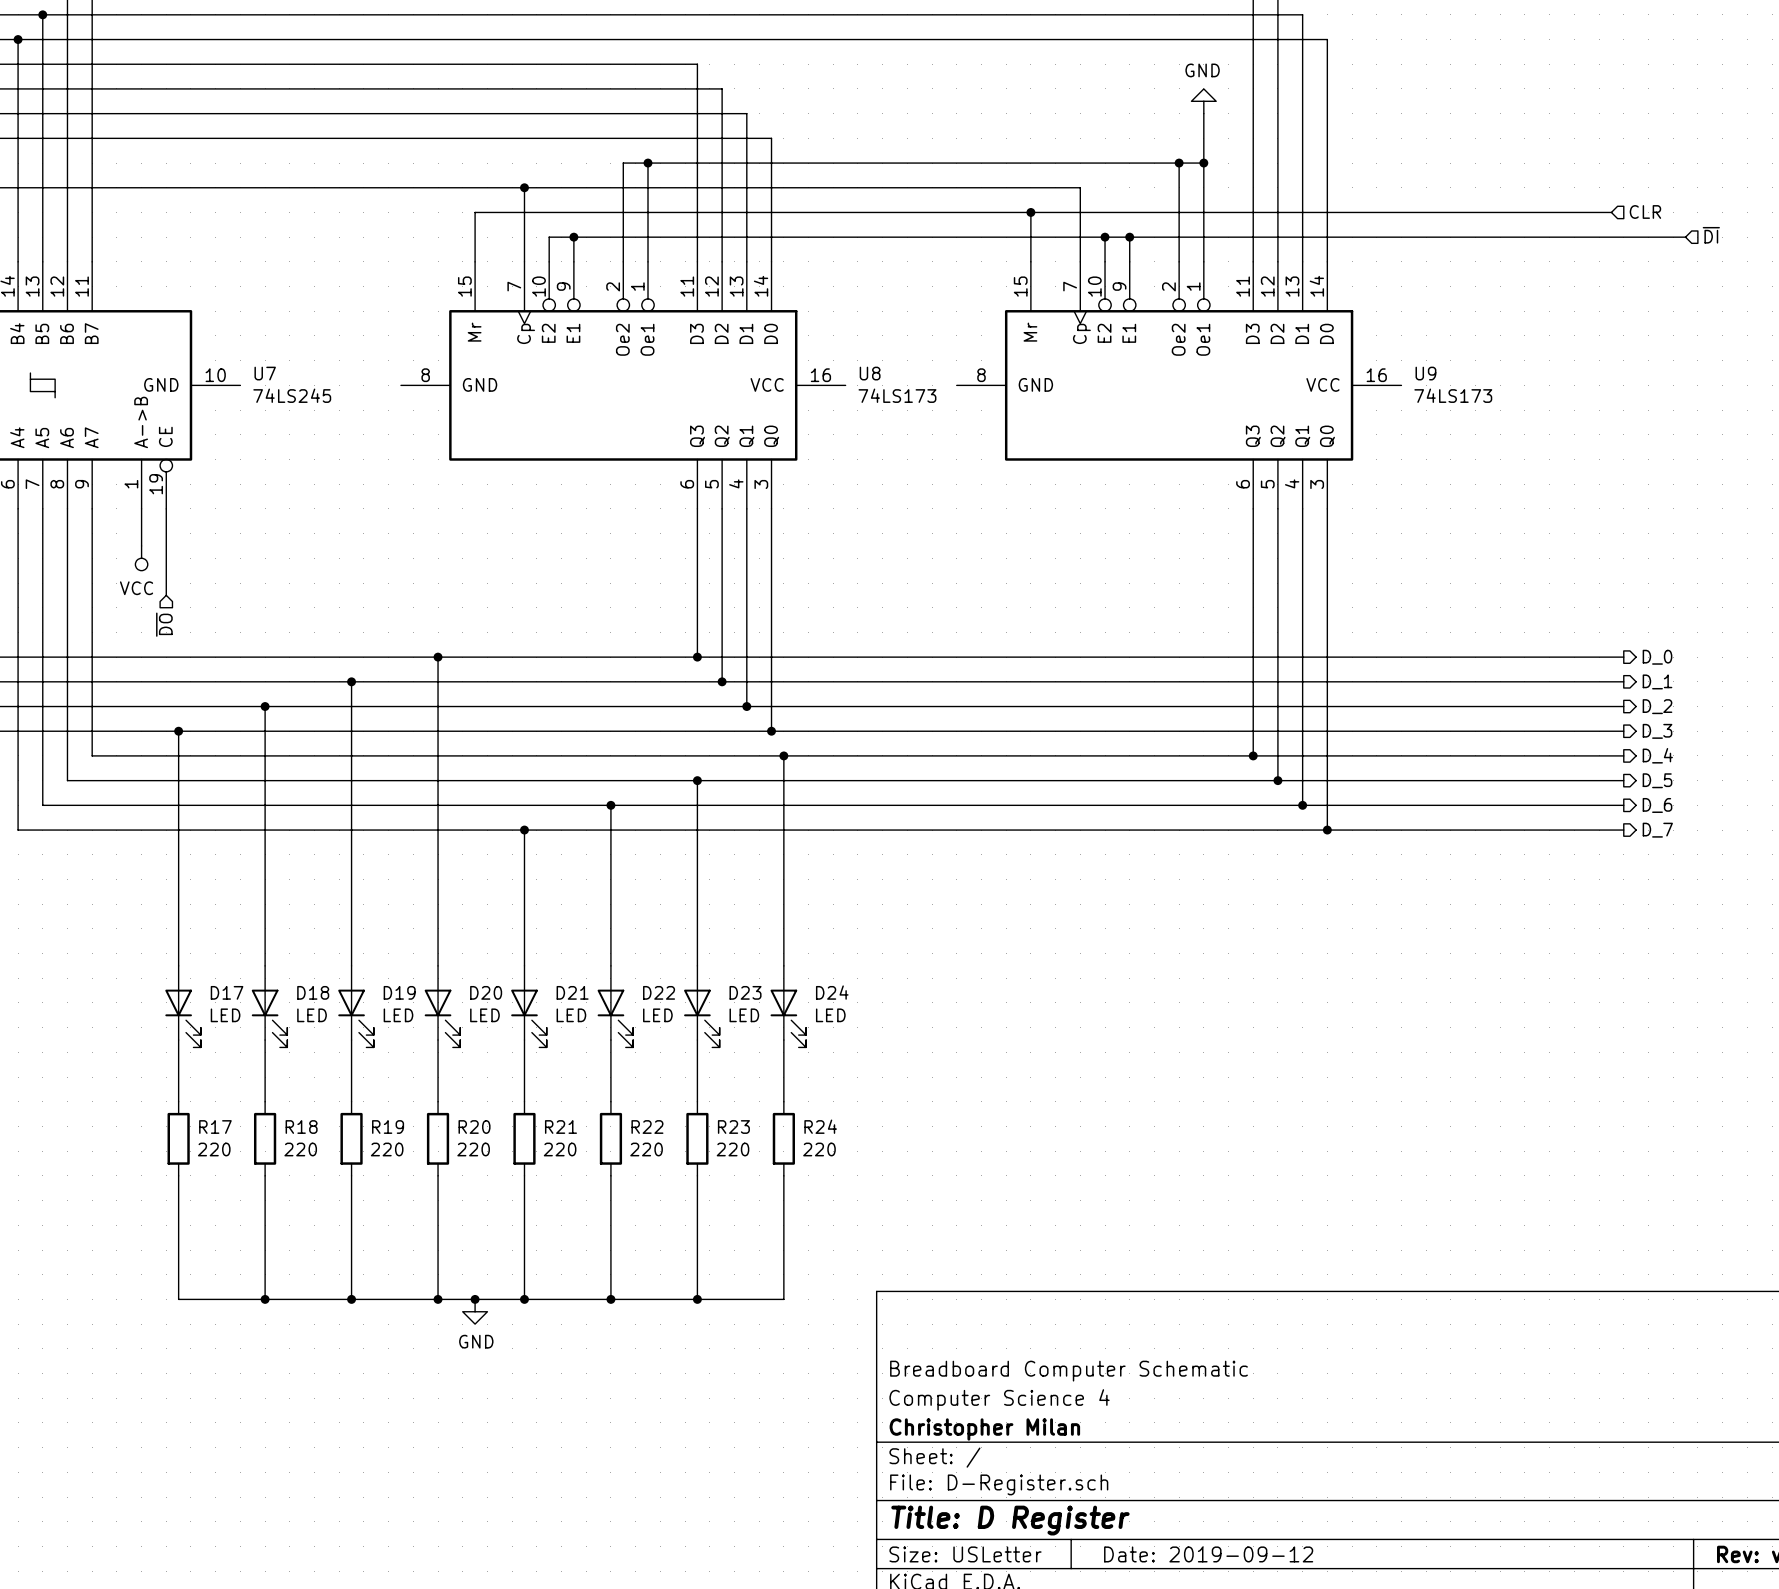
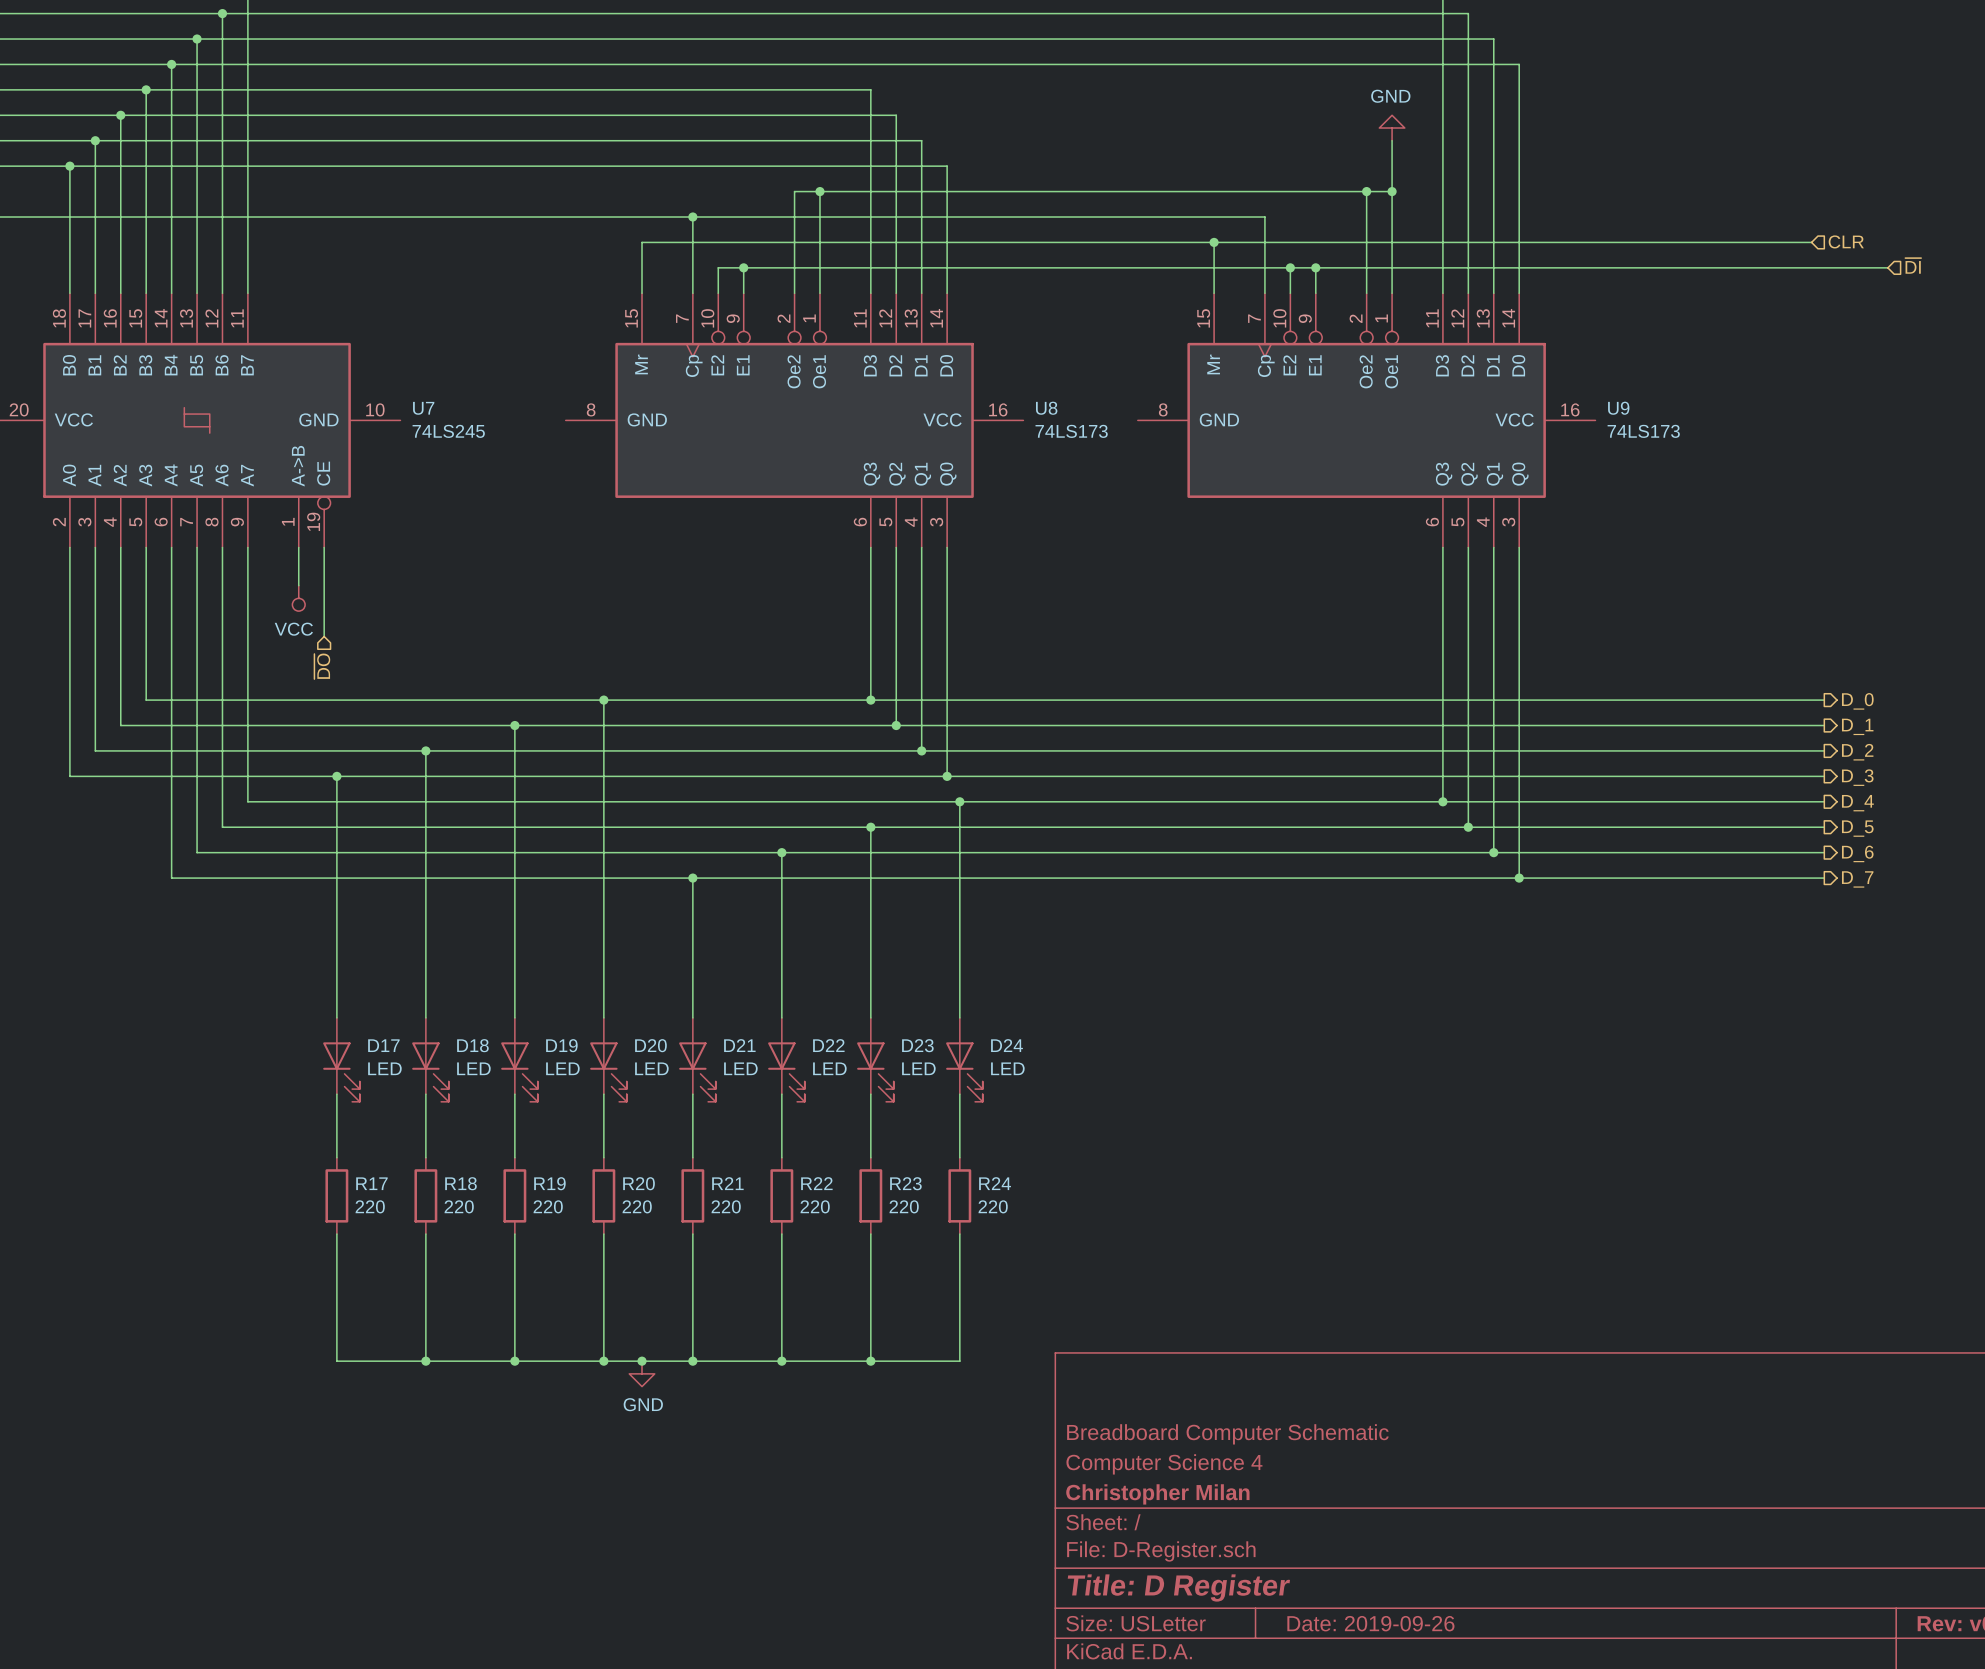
title block: Date: 2019-09-12 (1208, 1554) -> Date: 2019-09-26 (1370, 1623)

